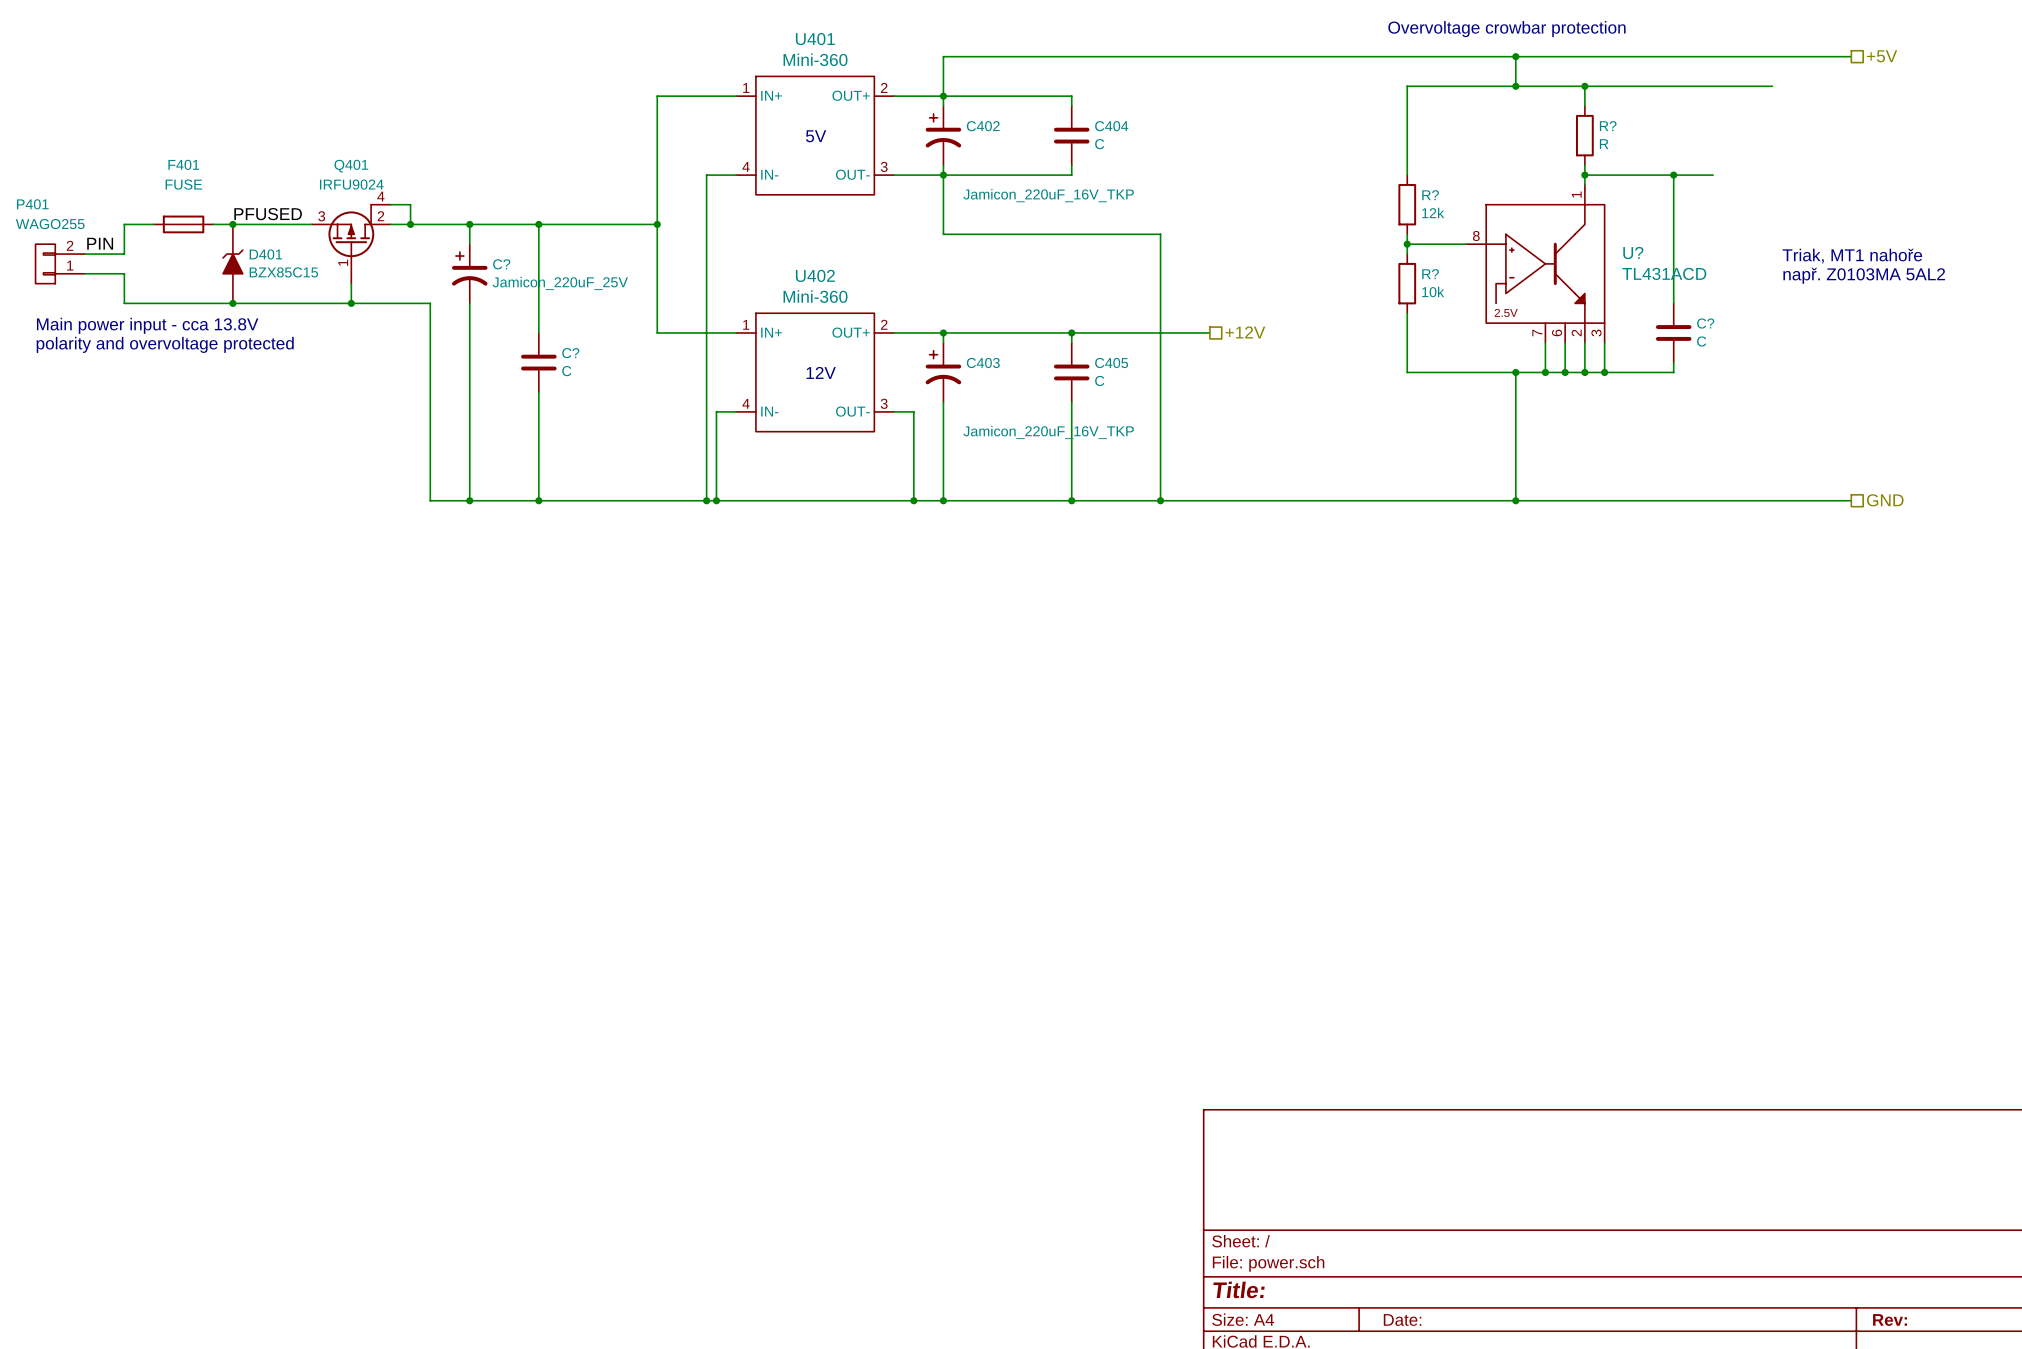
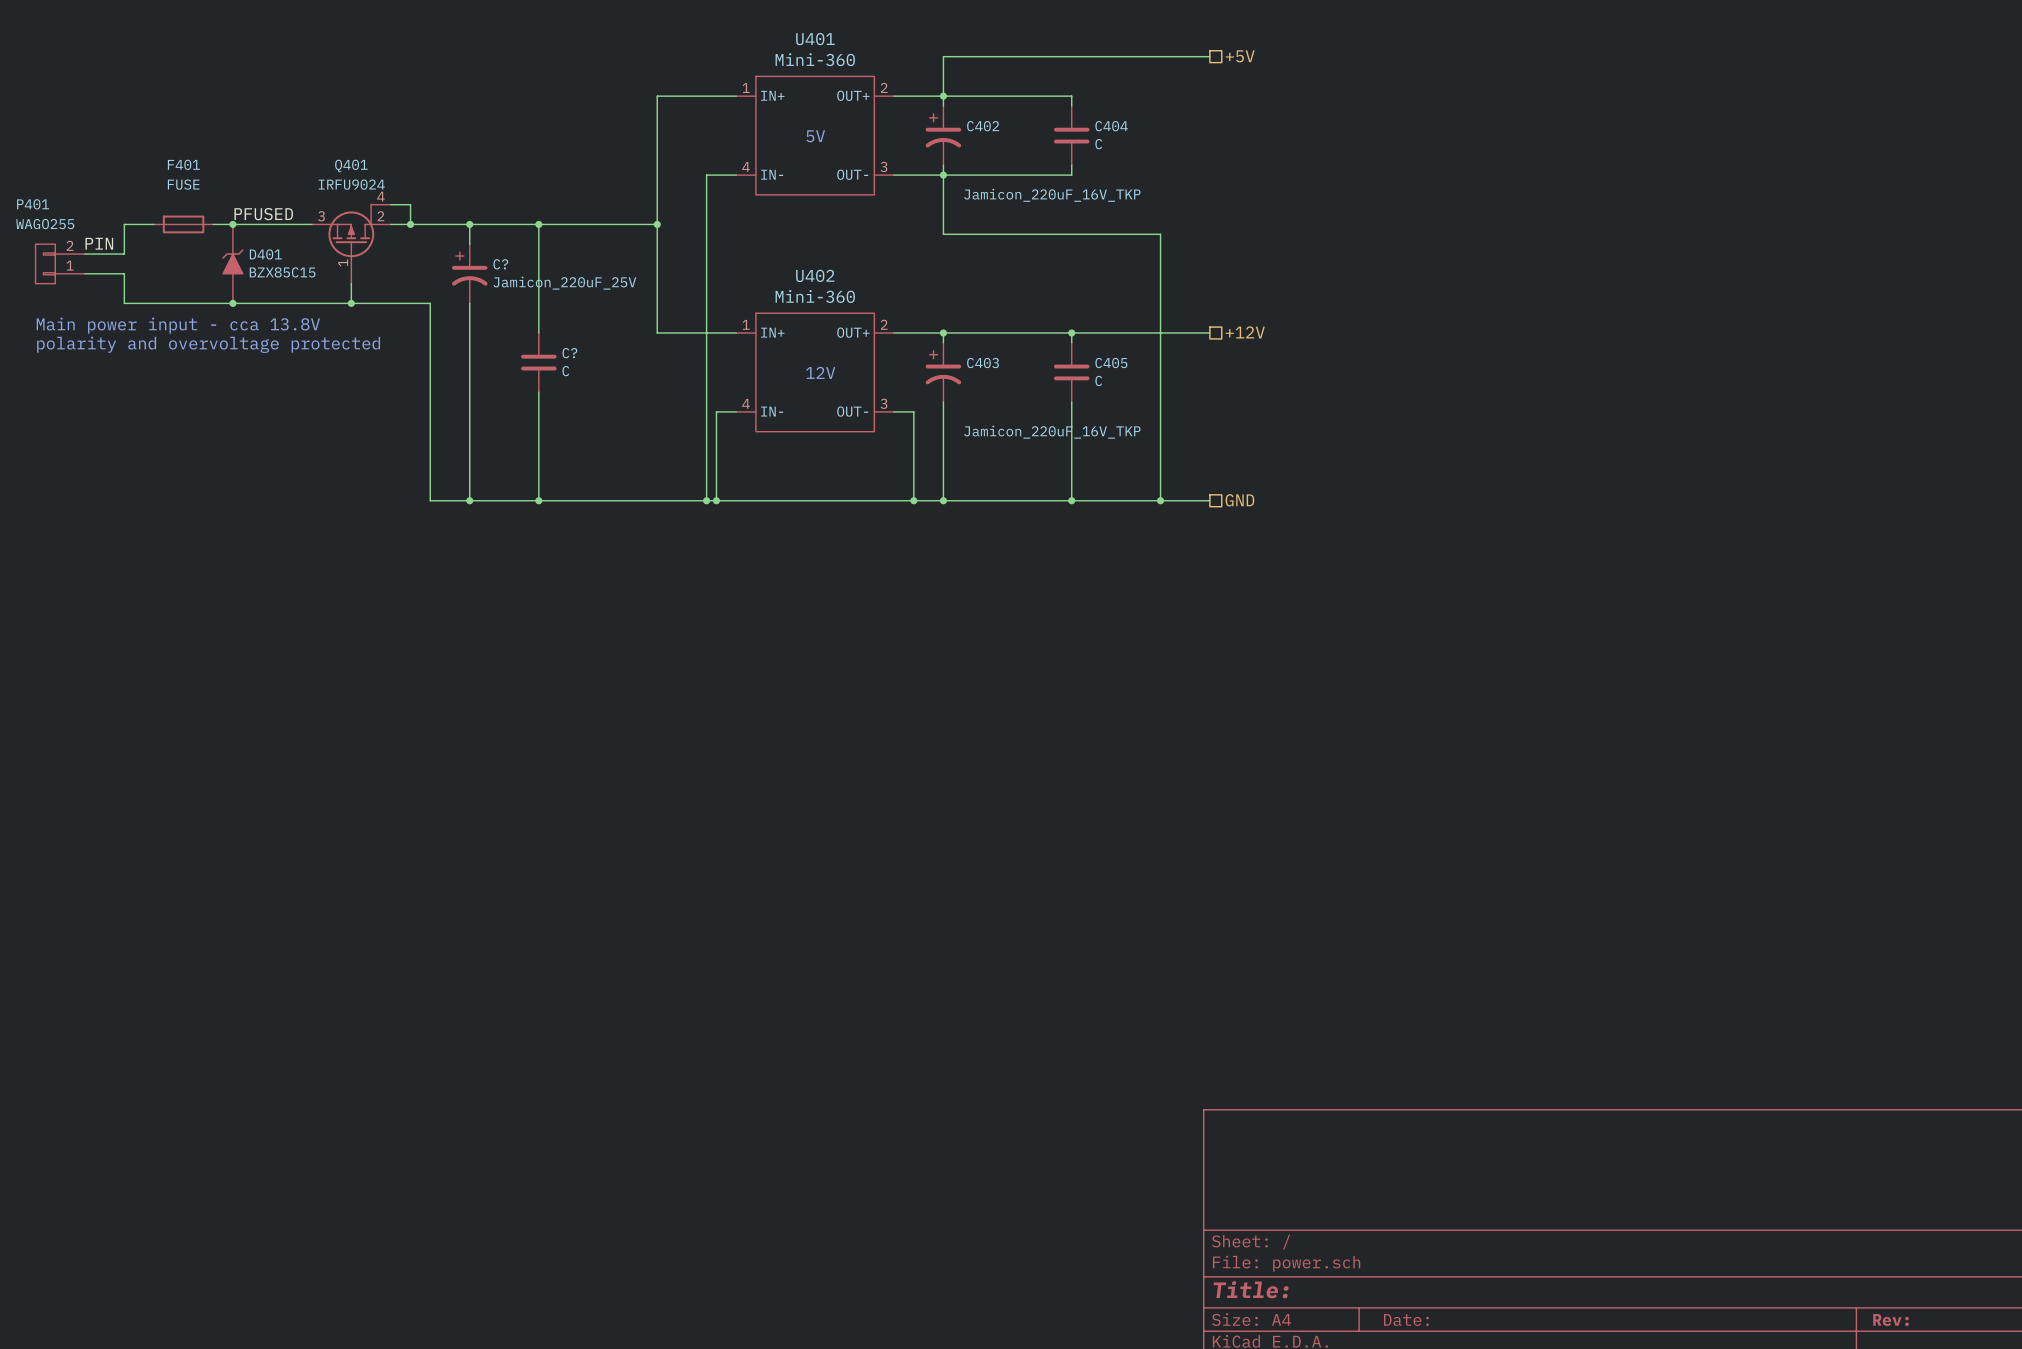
text: Overvoltage crowbar protection (1506, 29) -> none
wire: (1209, 56) (1851, 56) -> none
hierarchical label: none -> +5V (1240, 56)
wire: (1515, 56) (1515, 86) -> none
junction: (1515, 56) -> none
hierarchical label: +5V (1882, 56) -> none
junction: (1515, 86) -> none
wire: (1584, 86) (1584, 106) -> none
junction: (1584, 86) -> none
wire: (1772, 86) (1407, 86) (1407, 175) -> none
R?: R (1584, 135) -> none
wire: (1584, 165) (1584, 184) -> none
wire: (1584, 175) (1713, 175) -> none
junction: (1584, 175) -> none
wire: (1673, 175) (1673, 303) -> none
junction: (1673, 175) -> none
R?: 12k (1407, 204) -> none
wire: (1407, 234) (1407, 254) -> none
wire: (1407, 244) (1466, 244) -> none
junction: (1407, 244) -> none
text: Triak, MT1 nahoře (1852, 256) -> none
U?: TL431ACD (1535, 263) -> none
text: např. Z0103MA 5AL2 (1864, 275) -> none
R?: 10k (1407, 283) -> none
wire: (1407, 313) (1407, 372) (1673, 372) (1673, 362) -> none
C?: C (1673, 332) -> none
wire: (1545, 342) (1545, 372) -> none
wire: (1565, 342) (1565, 372) -> none
wire: (1584, 342) (1584, 372) -> none
wire: (1604, 342) (1604, 372) -> none
wire: (1515, 372) (1515, 500) -> none
junction: (1515, 372) -> none
junction: (1545, 372) -> none
junction: (1565, 372) -> none
junction: (1584, 372) -> none
junction: (1604, 372) -> none
wire: (1209, 500) (1851, 500) -> none
hierarchical label: none -> GND (1239, 500)
junction: (1515, 500) -> none
hierarchical label: GND (1885, 500) -> none

